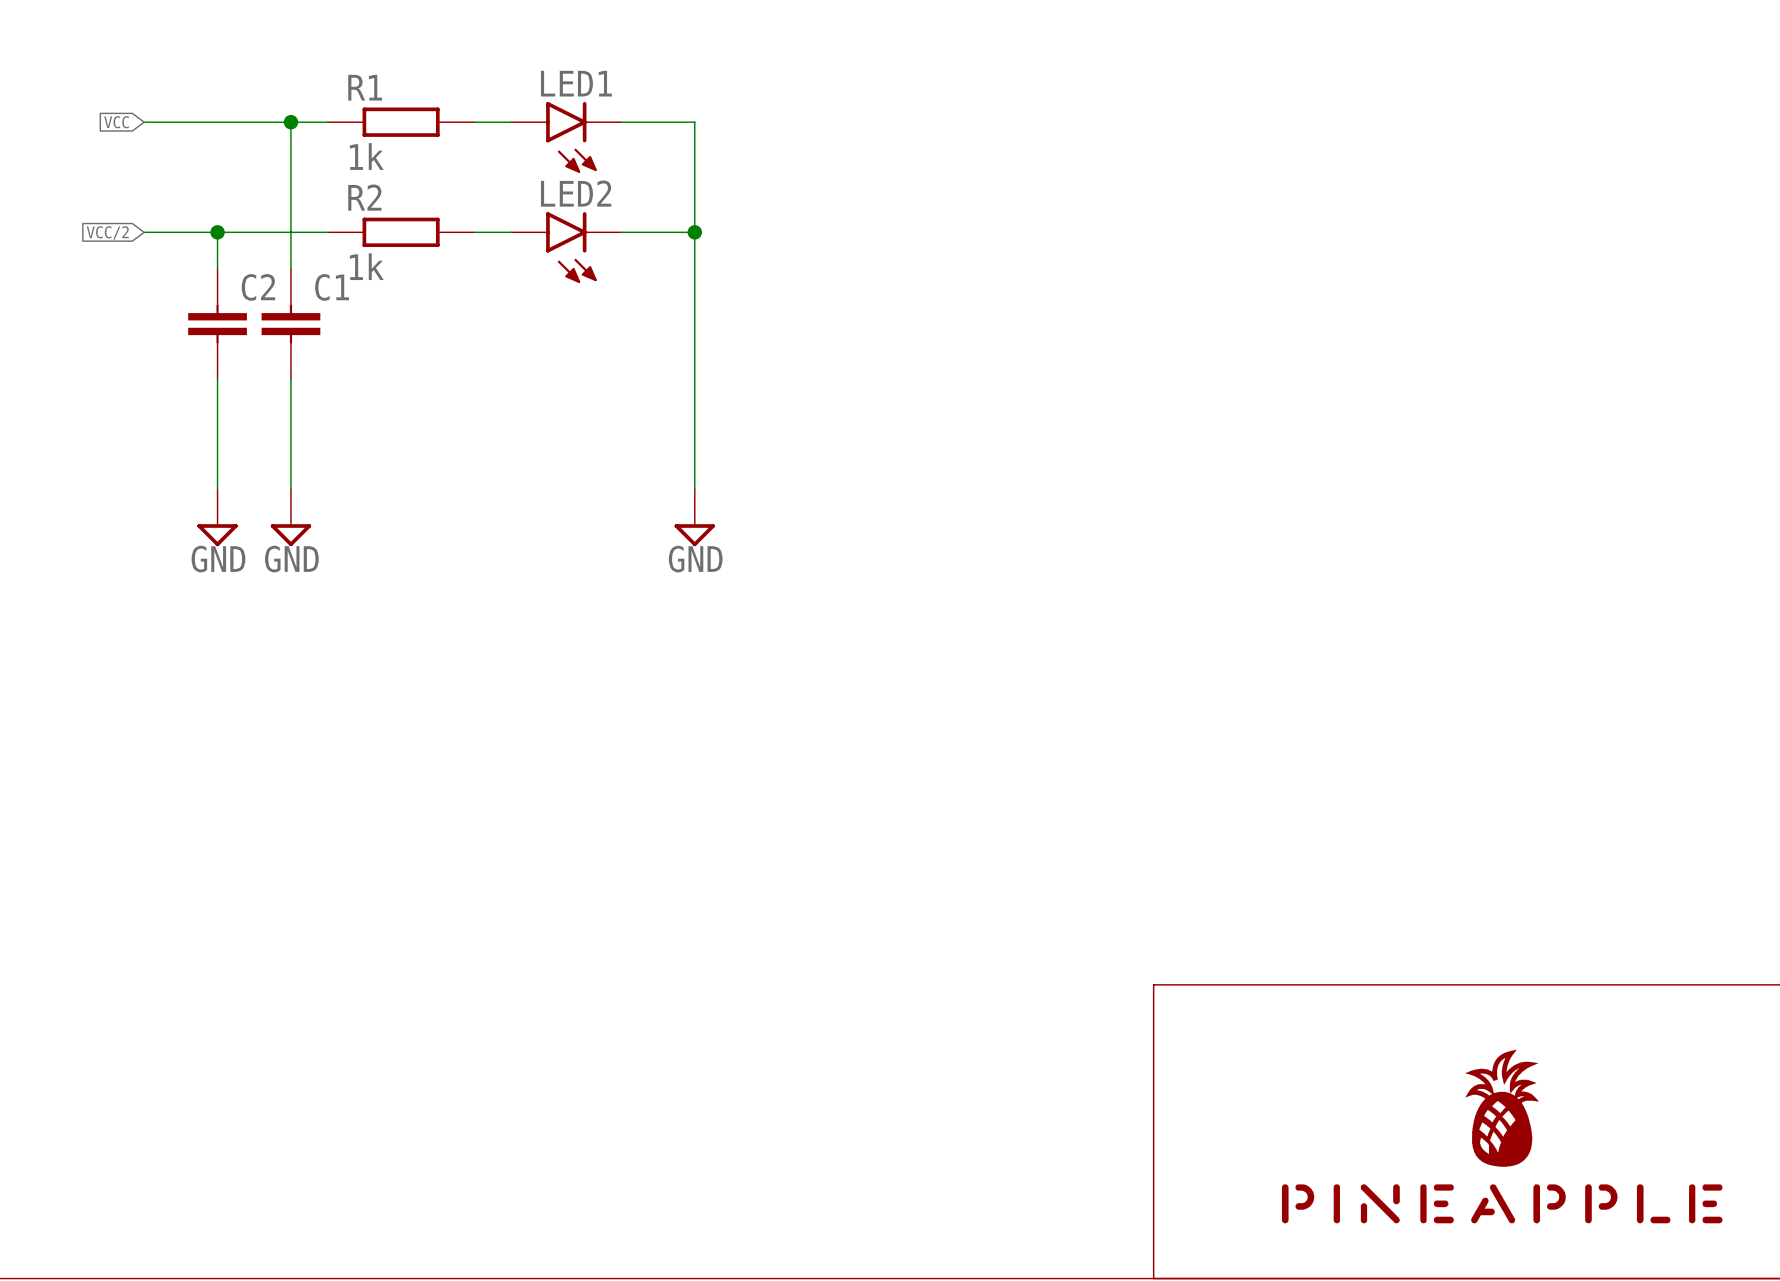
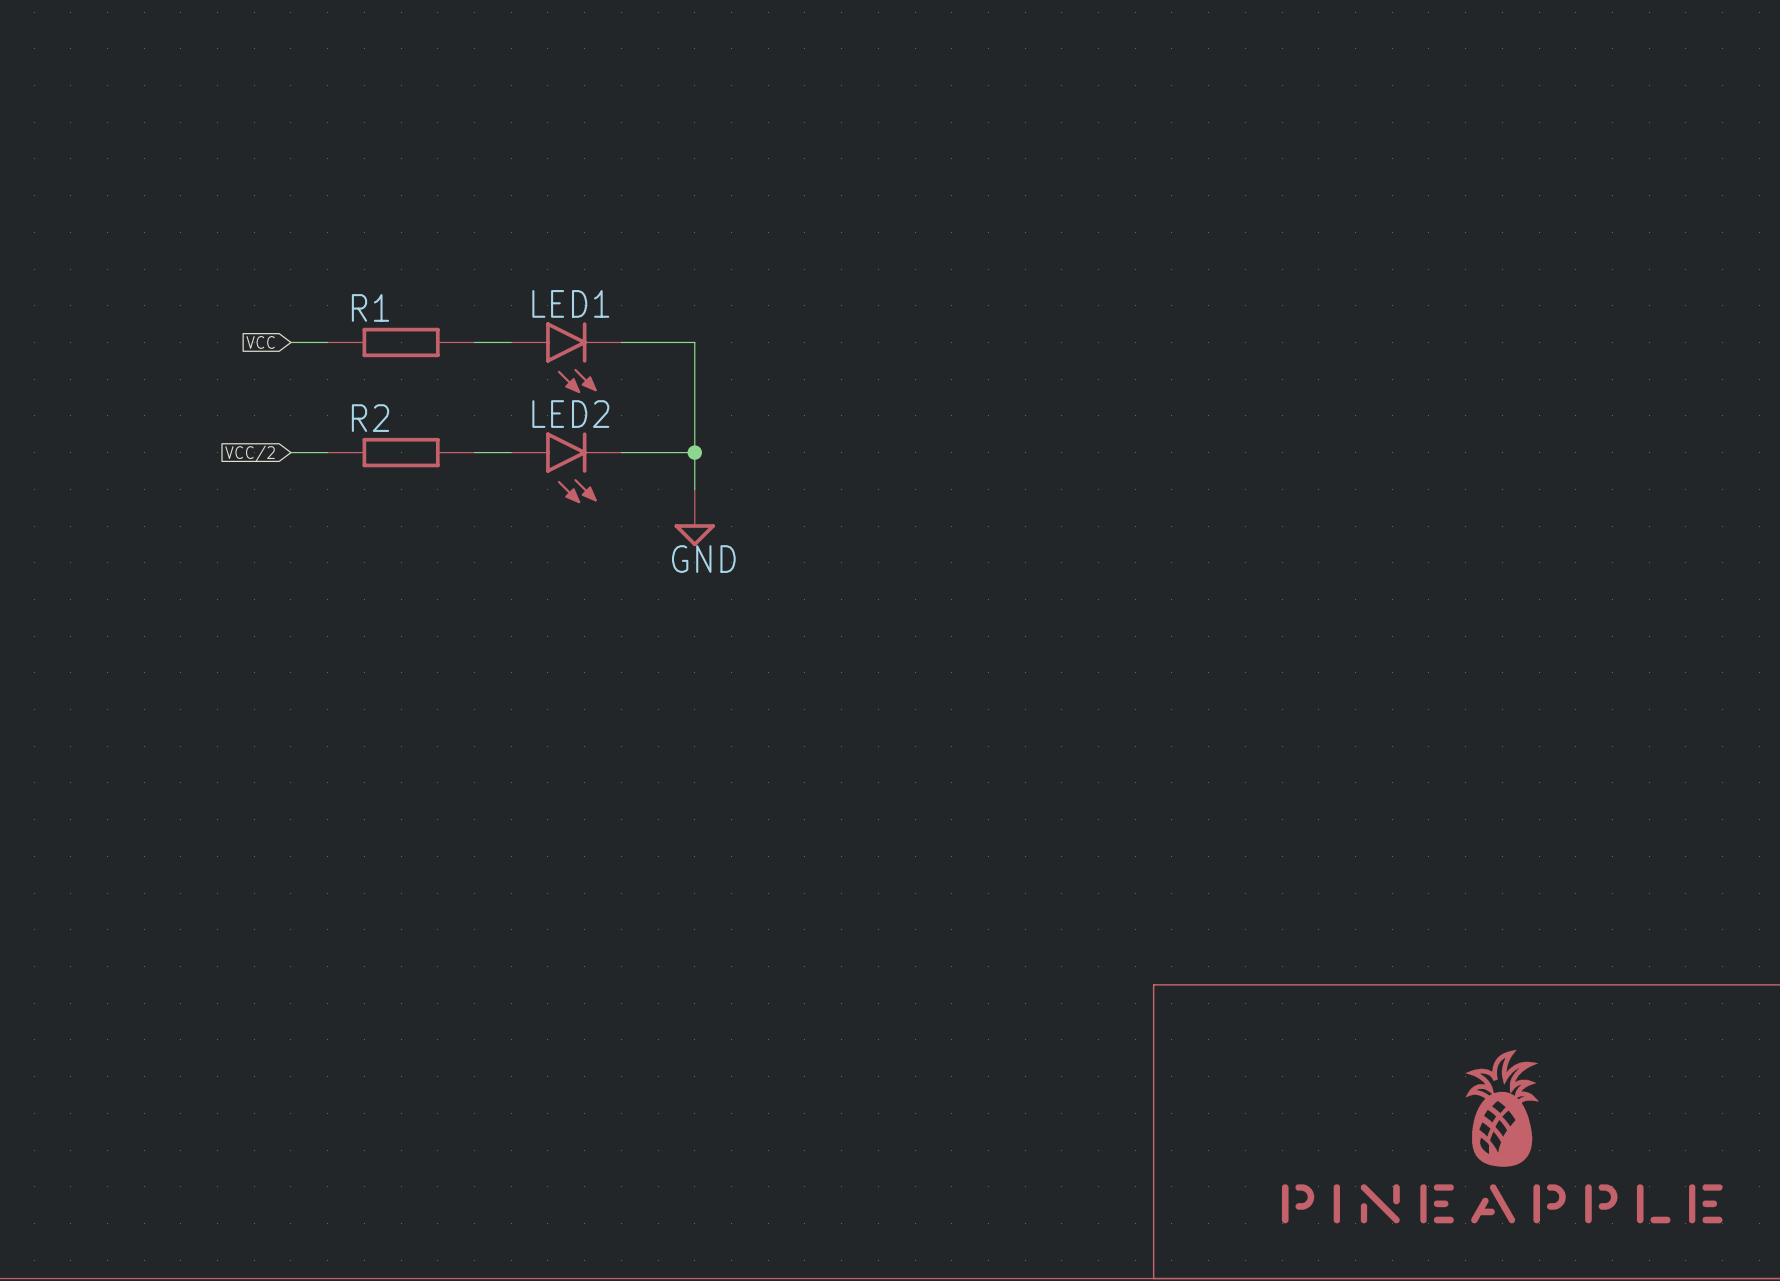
global label position: VCC (116, 122) -> VCC (260, 342)
wire: (144, 122) (327, 122) -> none
wire: (290, 122) (290, 269) -> none
junction: (290, 122) -> none
R1 position: (401, 122) -> (401, 342)
wire: (474, 122) (511, 122) -> (474, 342) (511, 342)
wire: (621, 122) (694, 122) (694, 342) -> (621, 342) (694, 342)
LED1 position: (566, 137) -> (566, 357)
R1 value: 1k (366, 156) -> none
global label position: VCC/2 (107, 232) -> VCC/2 (250, 453)
wire: (144, 232) (327, 232) -> none
wire: (217, 232) (217, 269) -> none
junction: (217, 232) -> none
R2 position: (401, 232) -> (401, 452)
wire: (474, 232) (511, 232) -> (474, 452) (511, 452)
wire: (621, 232) (694, 232) -> (621, 452) (694, 452)
junction: (694, 232) -> none
LED2 position: (566, 247) -> (566, 467)
R2 value: 1k (366, 266) -> none
C2: (217, 324) -> none
C1: (290, 324) -> none
wire: none -> (290, 342) (327, 342)
wire: (217, 379) (217, 489) -> none
wire: (290, 379) (290, 489) -> none
wire: none -> (290, 452) (327, 452)
junction: none -> (694, 452)
power symbol: GND (217, 517) -> none
power symbol: GND (290, 517) -> none

